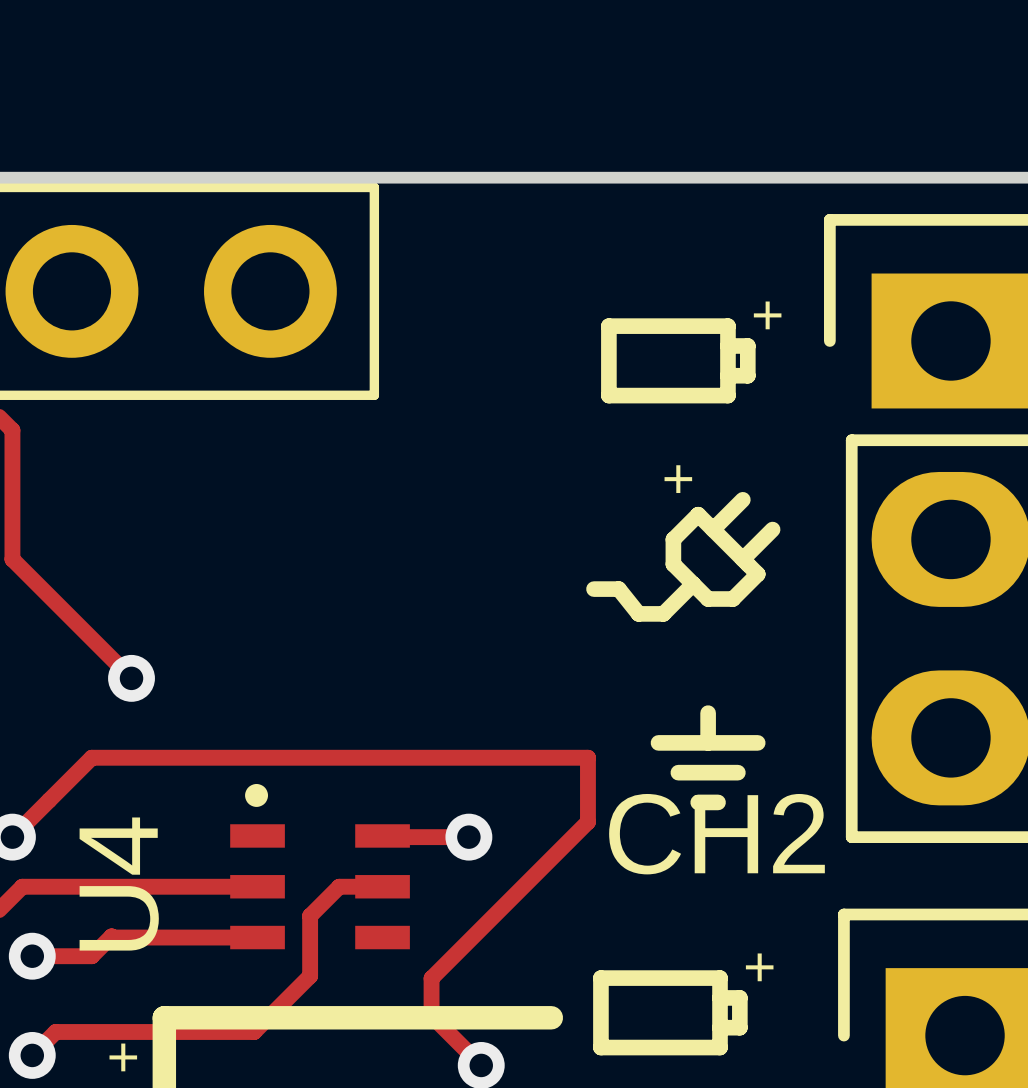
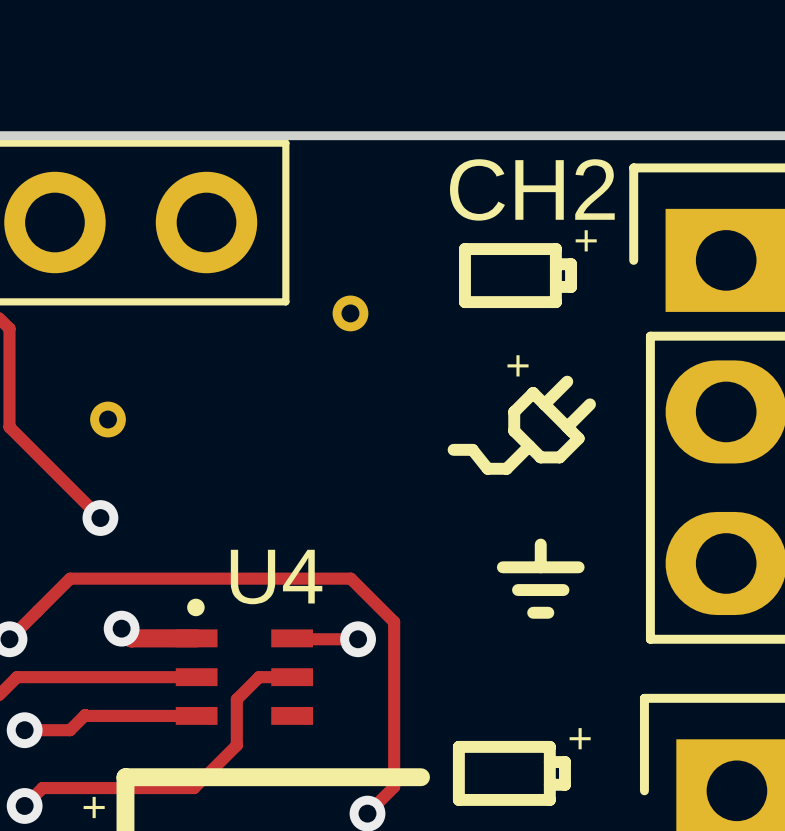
part: none -> (350, 313)
part: none -> (108, 419)
track: (459, 757) (587, 757) (587, 822) (431, 978) (431, 1015) (481, 1065) -> (350, 578) (394, 621) (394, 786) (367, 813)
track: none -> (121, 628) (131, 638) (196, 638)
via: none -> (121, 628)
CH2 name position: CH2 (716, 834) -> CH2 (532, 189)
U4 name rotation: 0° (119, 884) -> 90° clockwise (276, 577)
U4 name position: U4 (119, 884) -> U4 (276, 577)

